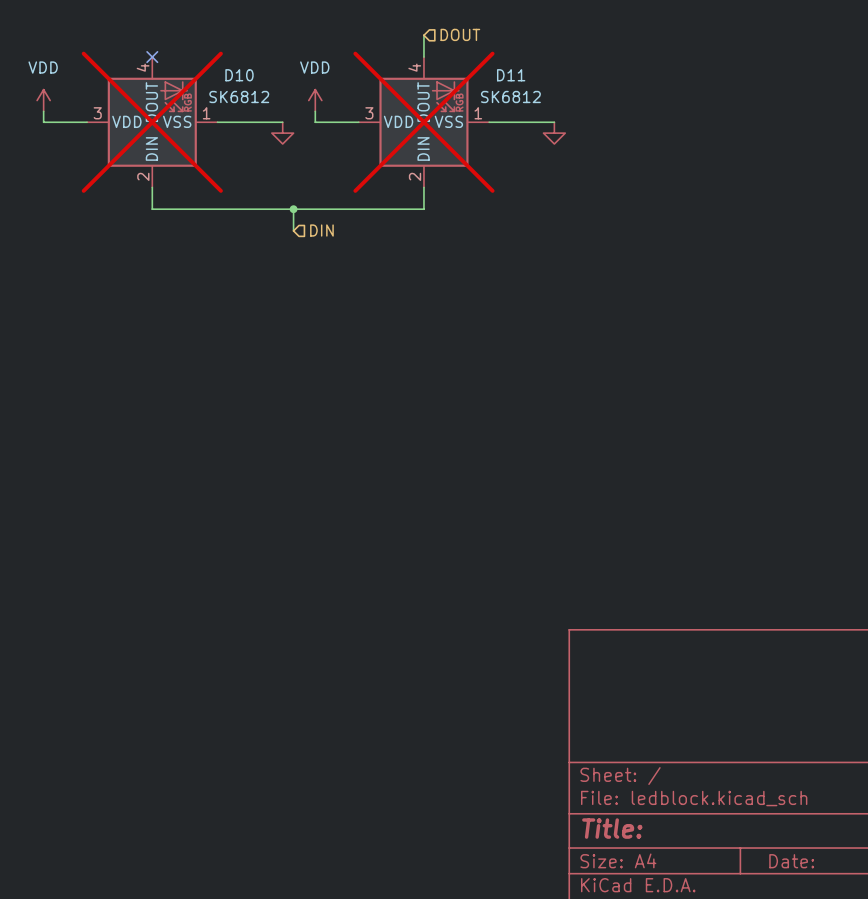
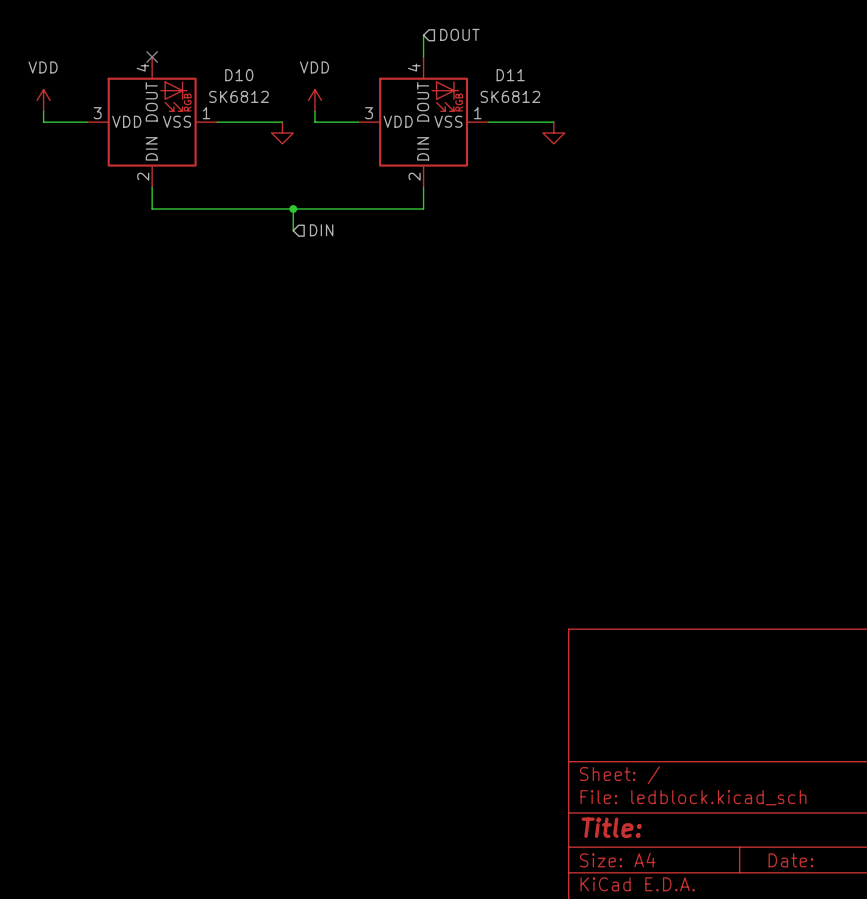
D10 do-not-place cross: (152, 122) -> none
D11 do-not-place cross: (423, 122) -> none

